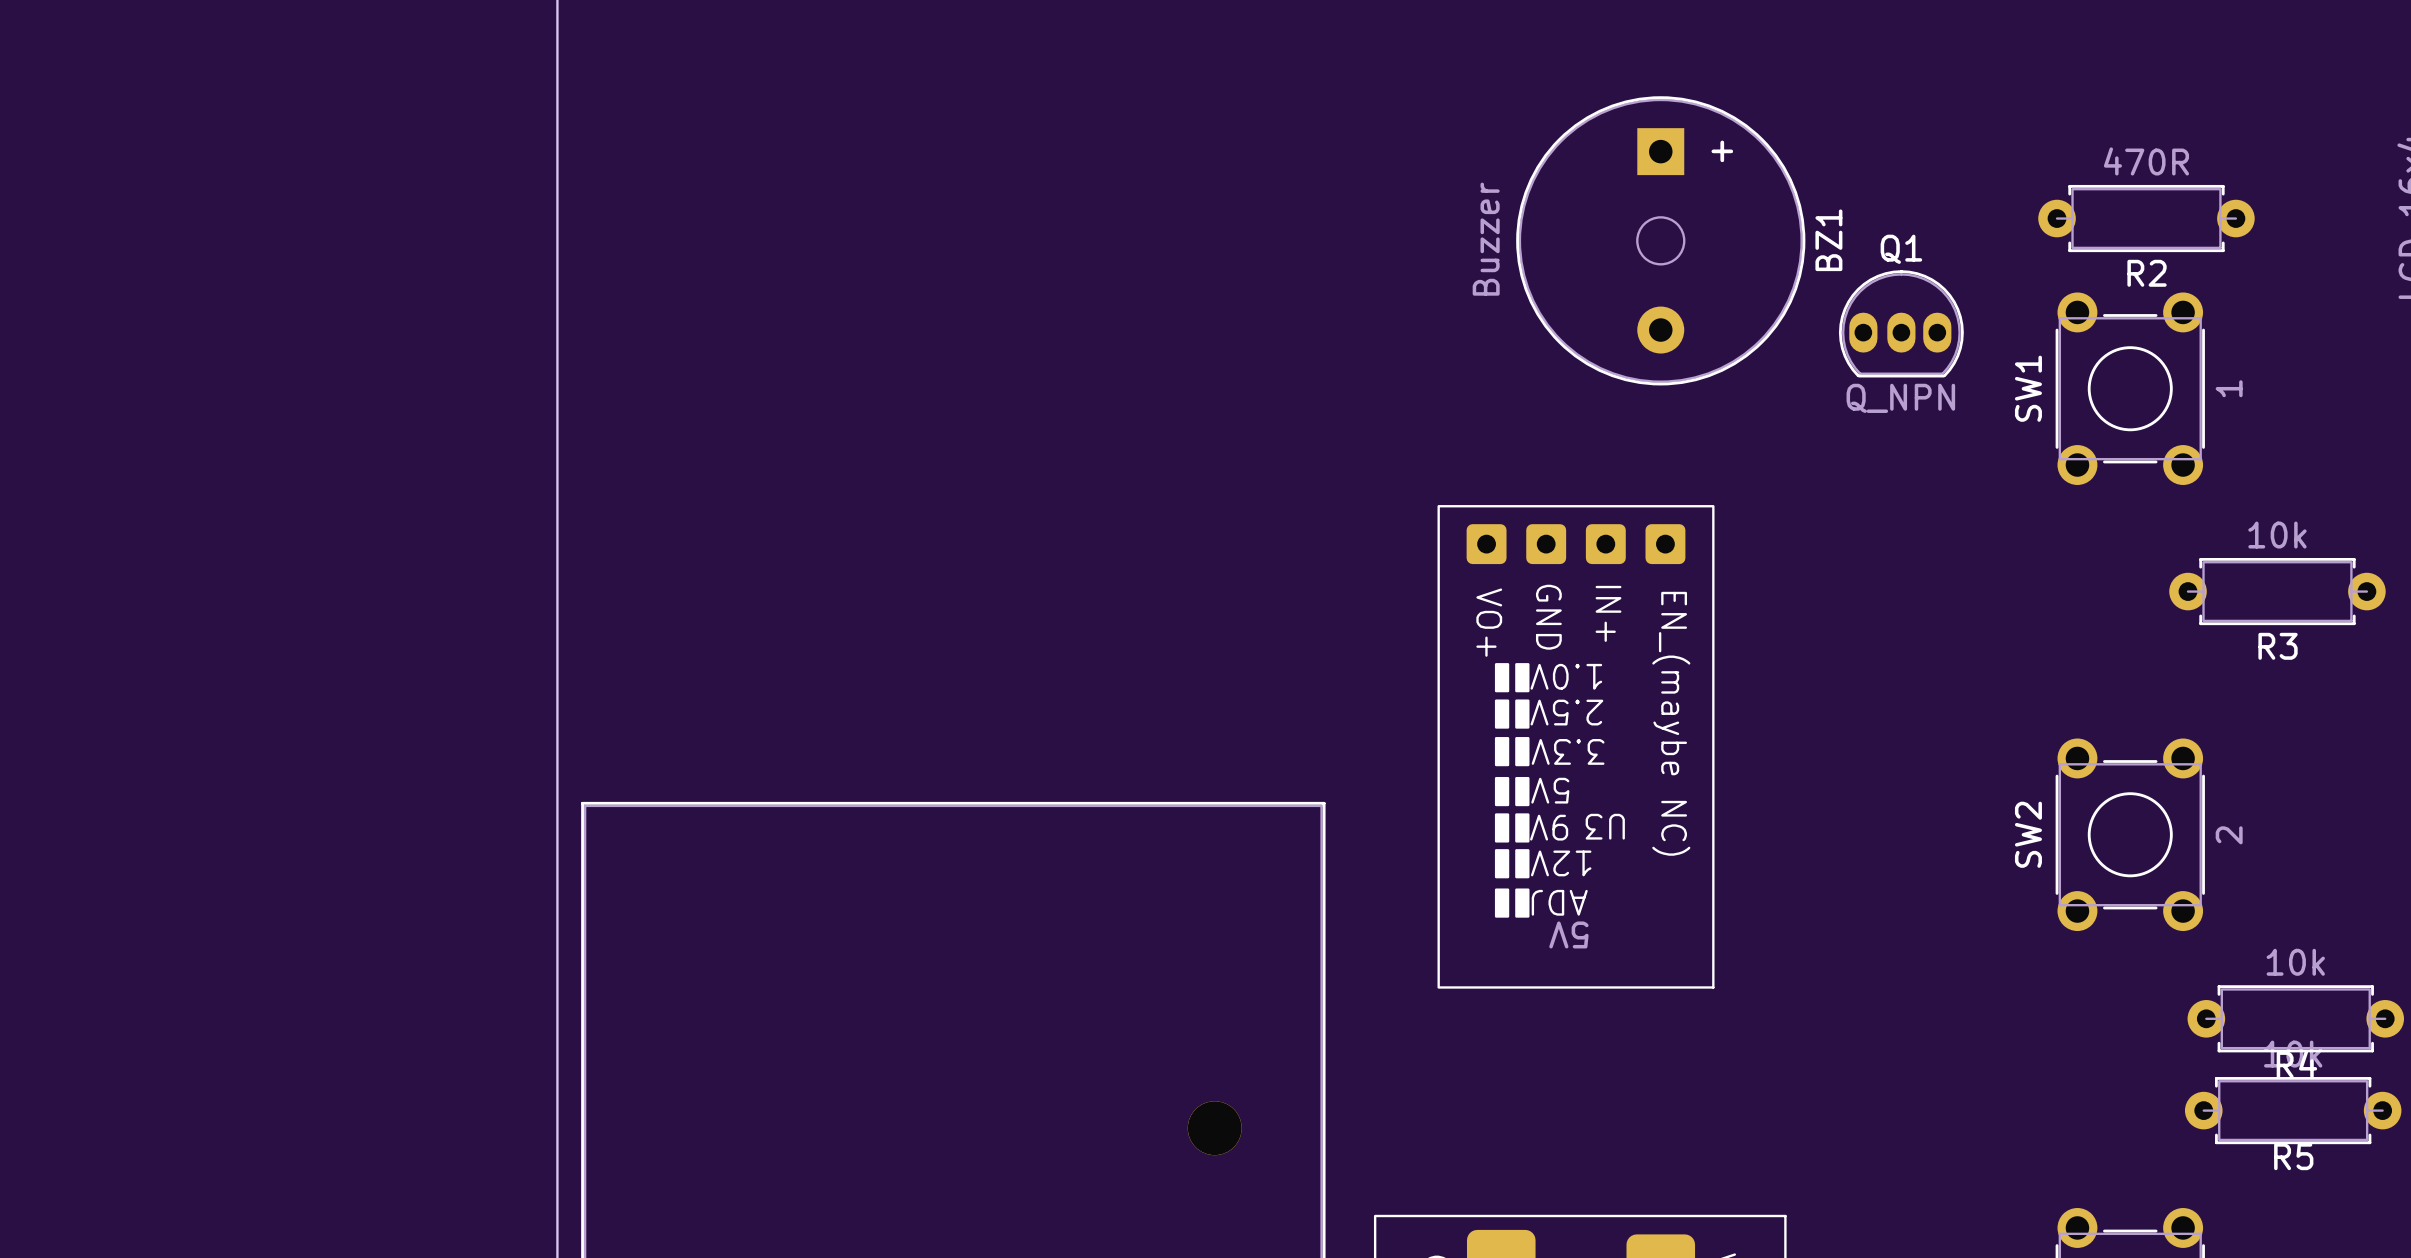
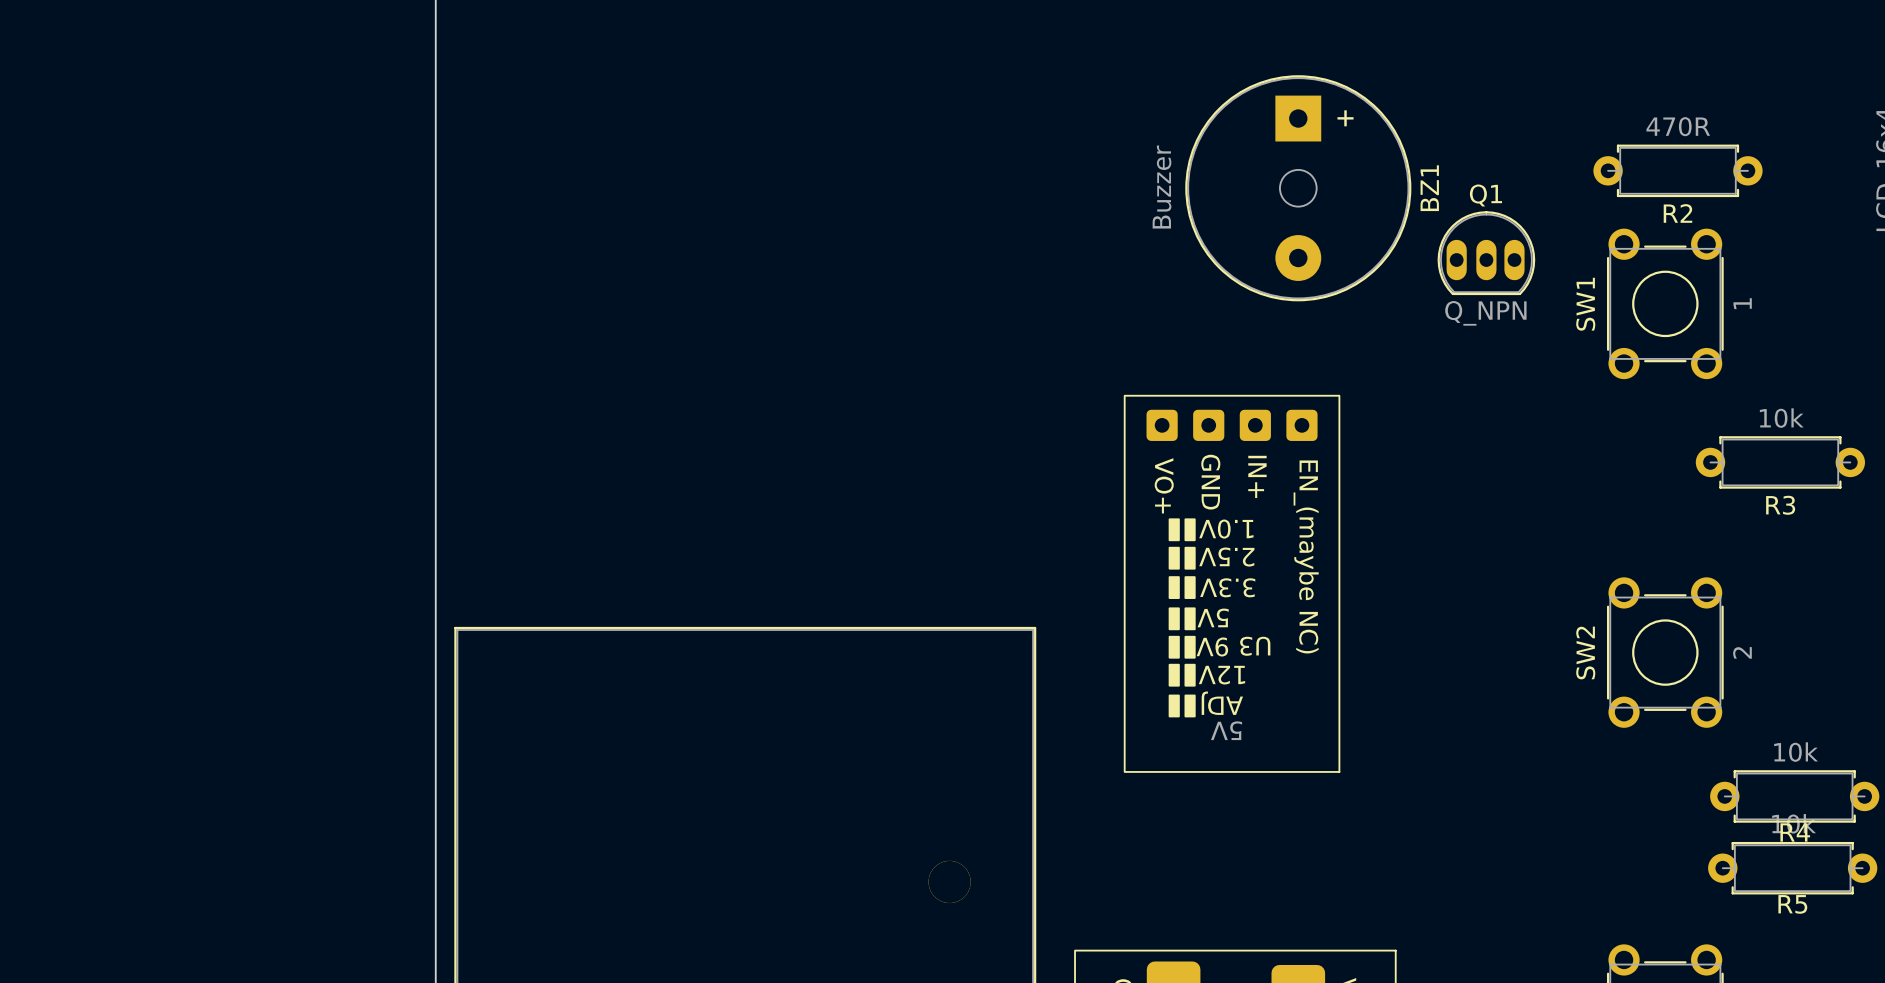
BZ1 footprint: [1516, 96, 1806, 386] -> [1185, 75, 1412, 302]
Q1 footprint: [1838, 270, 1964, 378] -> [1437, 211, 1536, 296]

